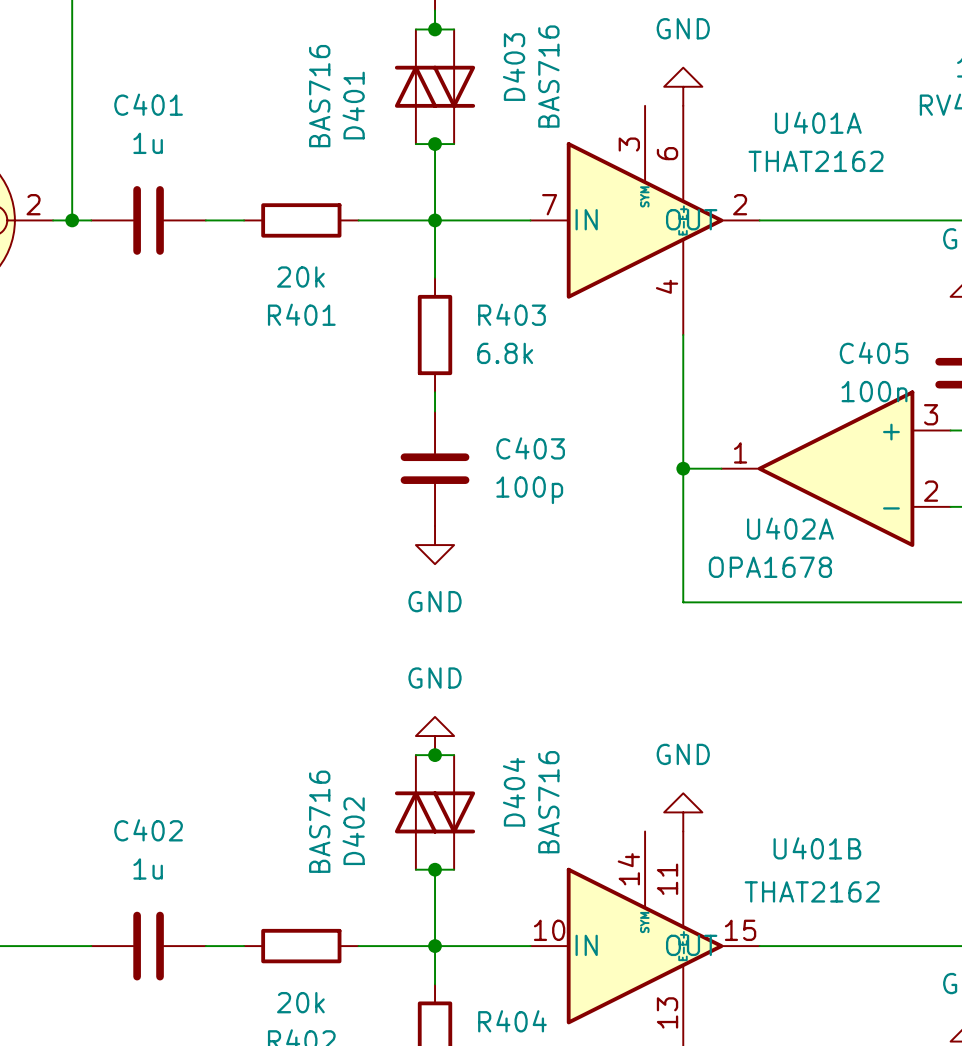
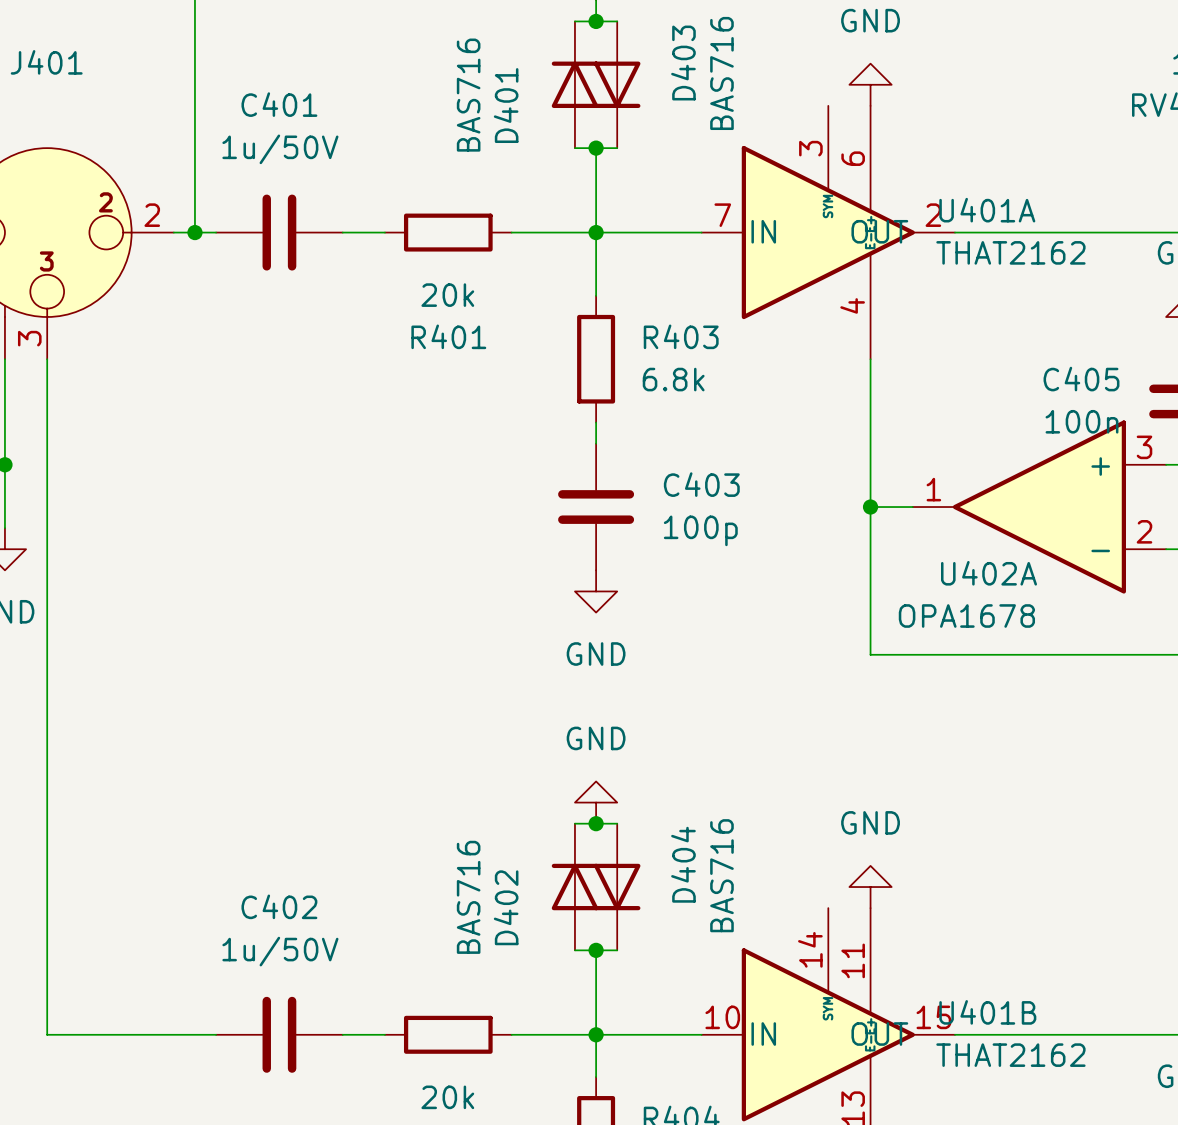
U401A name position: U401A (818, 122) -> U401A (987, 210)
C401 value: 1u (148, 143) -> 1u/50V (280, 149)
U401A value position: THAT2162 (816, 161) -> THAT2162 (1010, 252)
U401B name position: U401B (817, 848) -> U401B (987, 1012)
C402 value: 1u (148, 868) -> 1u/50V (280, 951)
U401B value position: THAT2162 (812, 891) -> THAT2162 (1010, 1055)

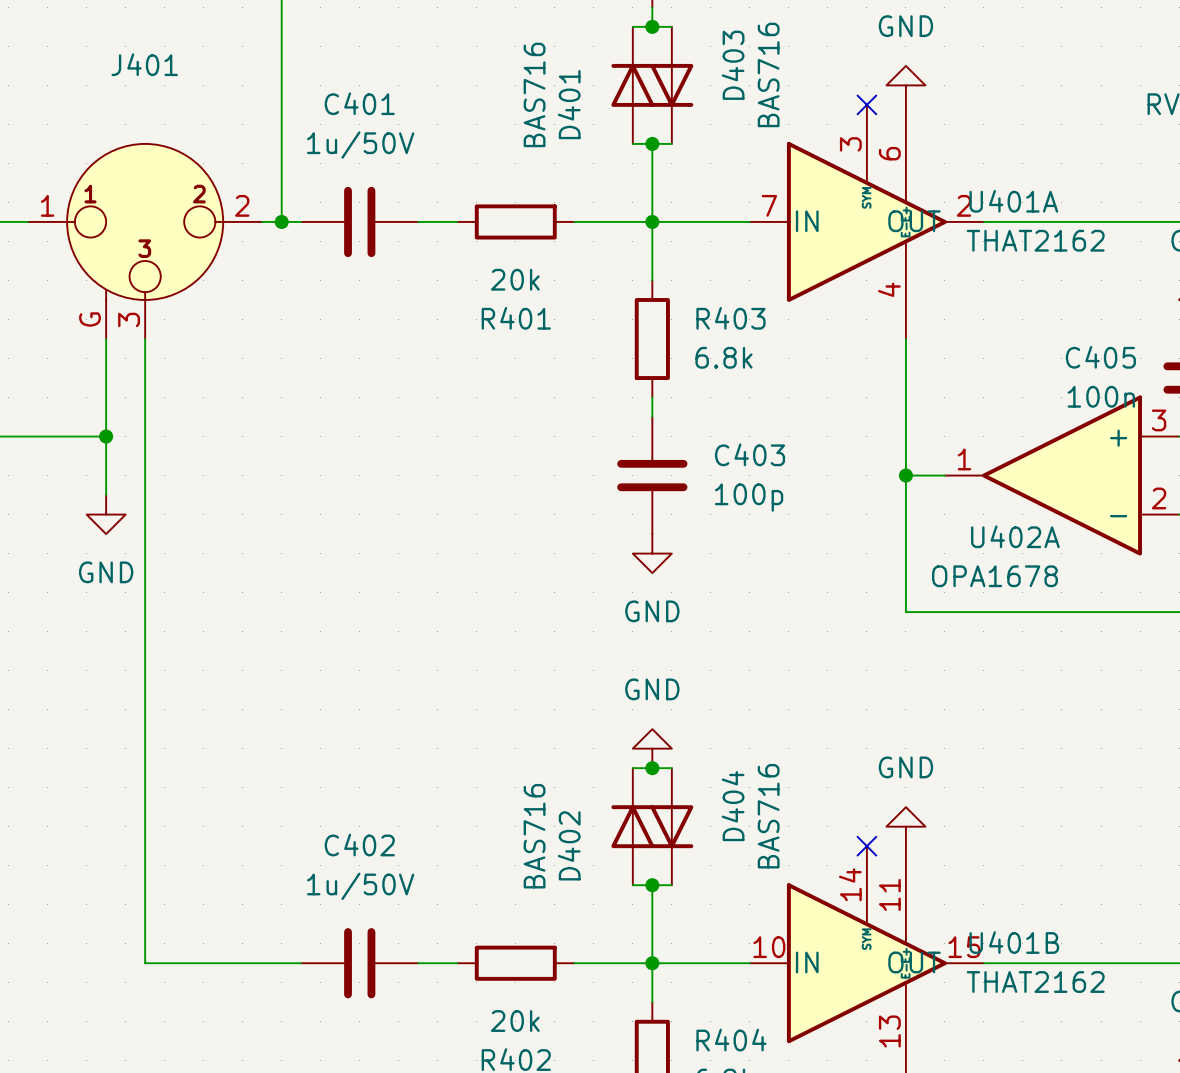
no-connect mark: none -> (866, 104)
no-connect mark: none -> (866, 846)

